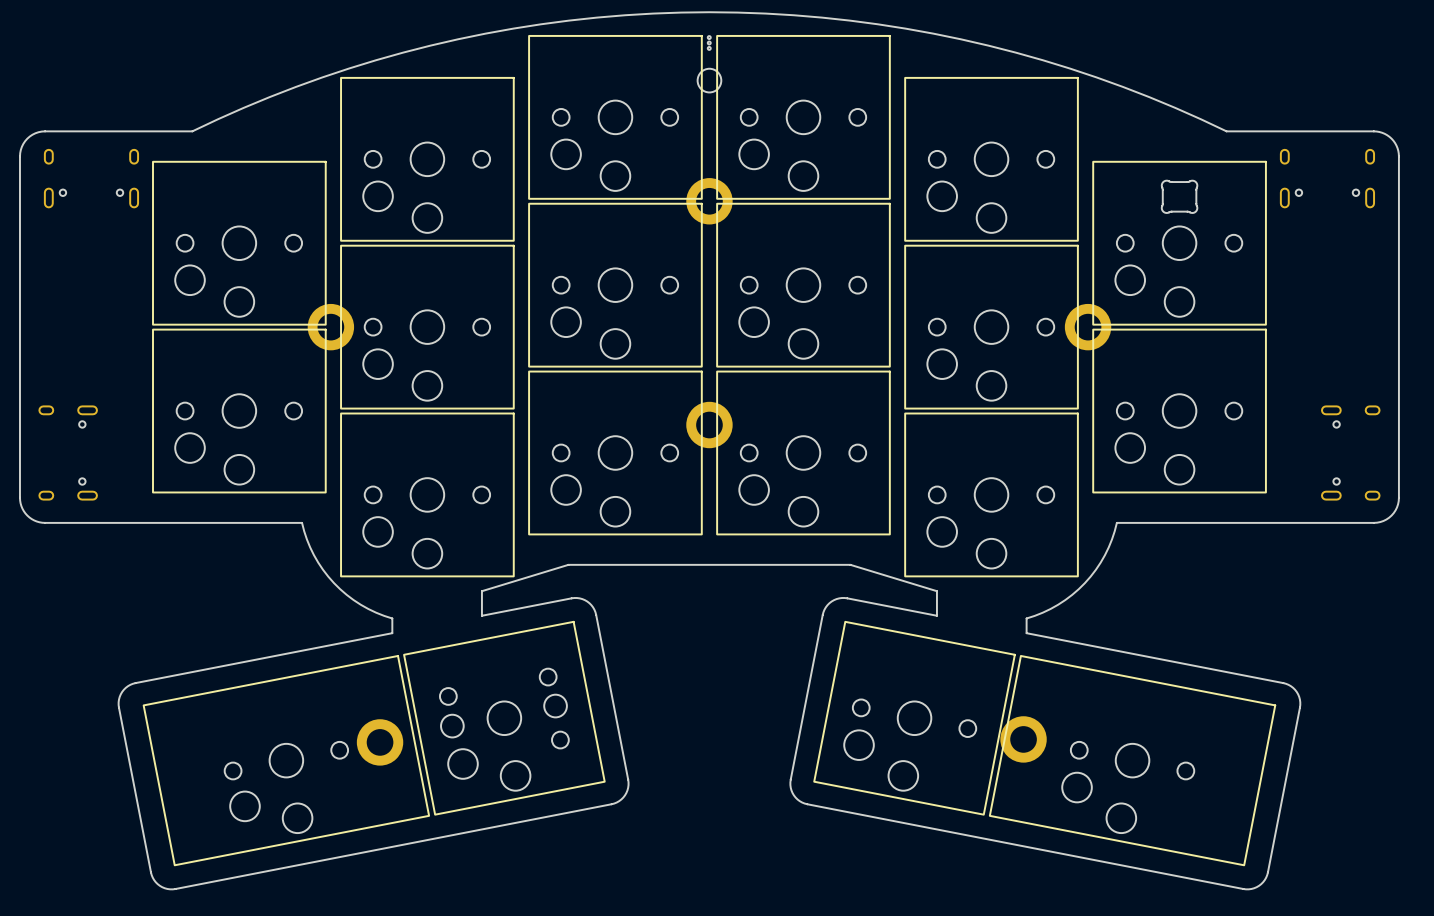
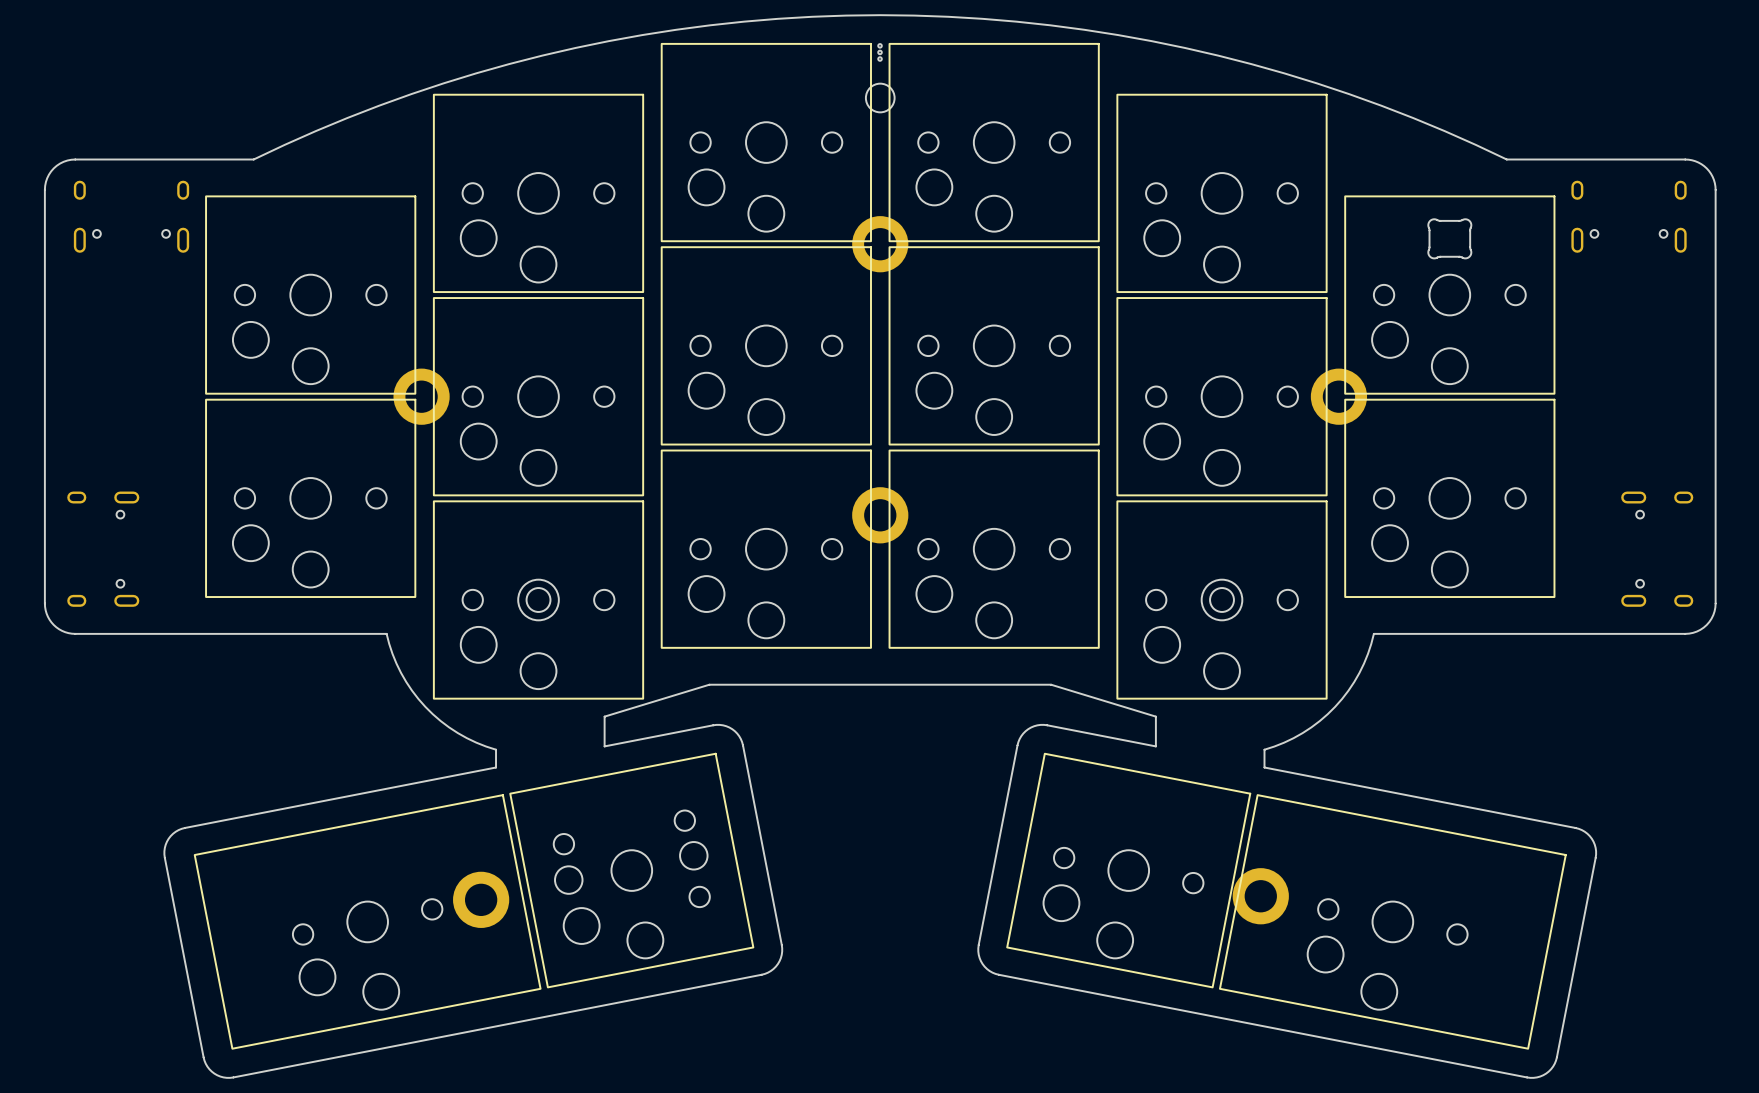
round board edge: none -> [526, 587, 551, 613]
round board edge: none -> [1209, 587, 1235, 613]

